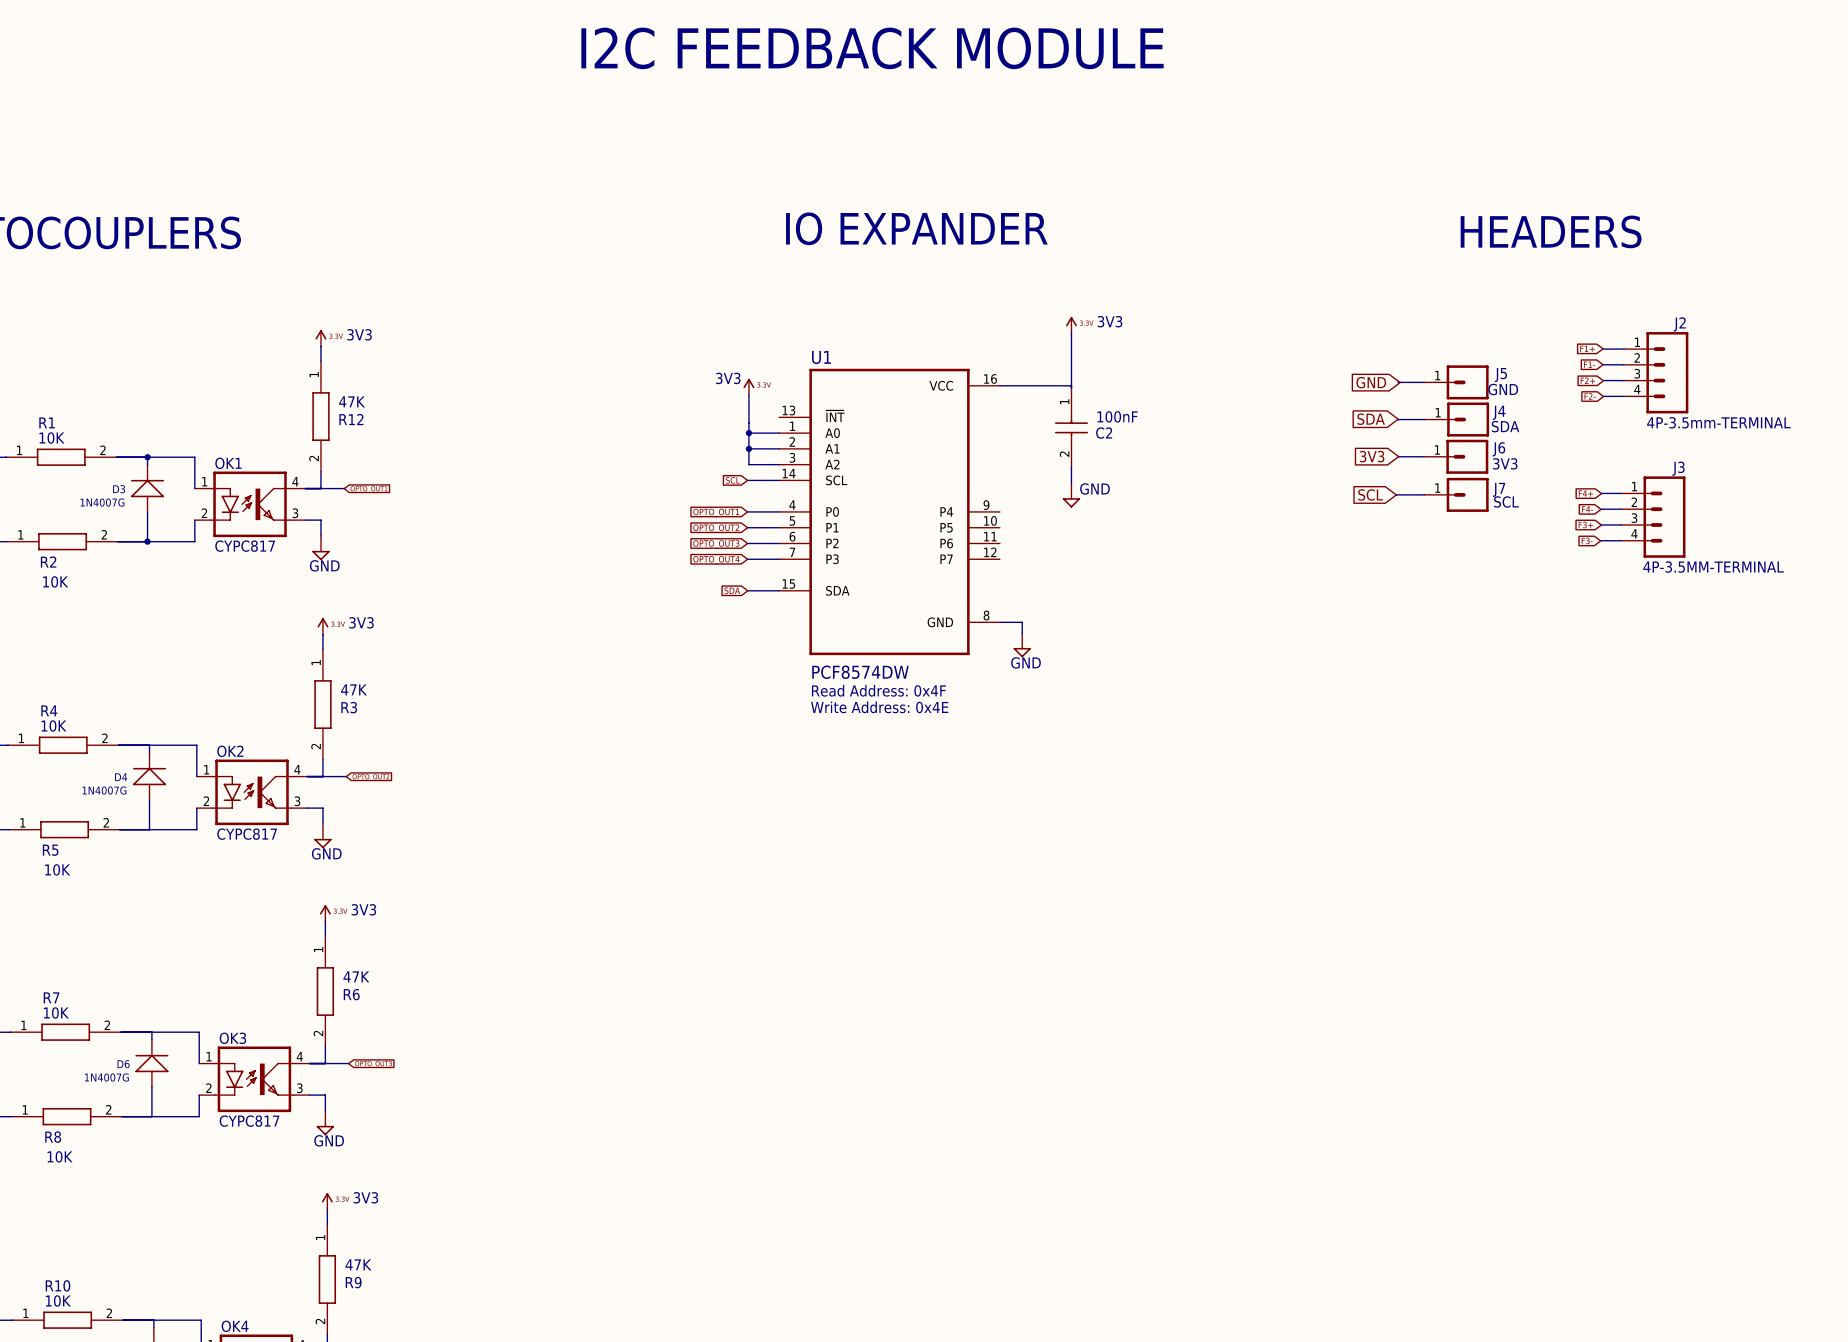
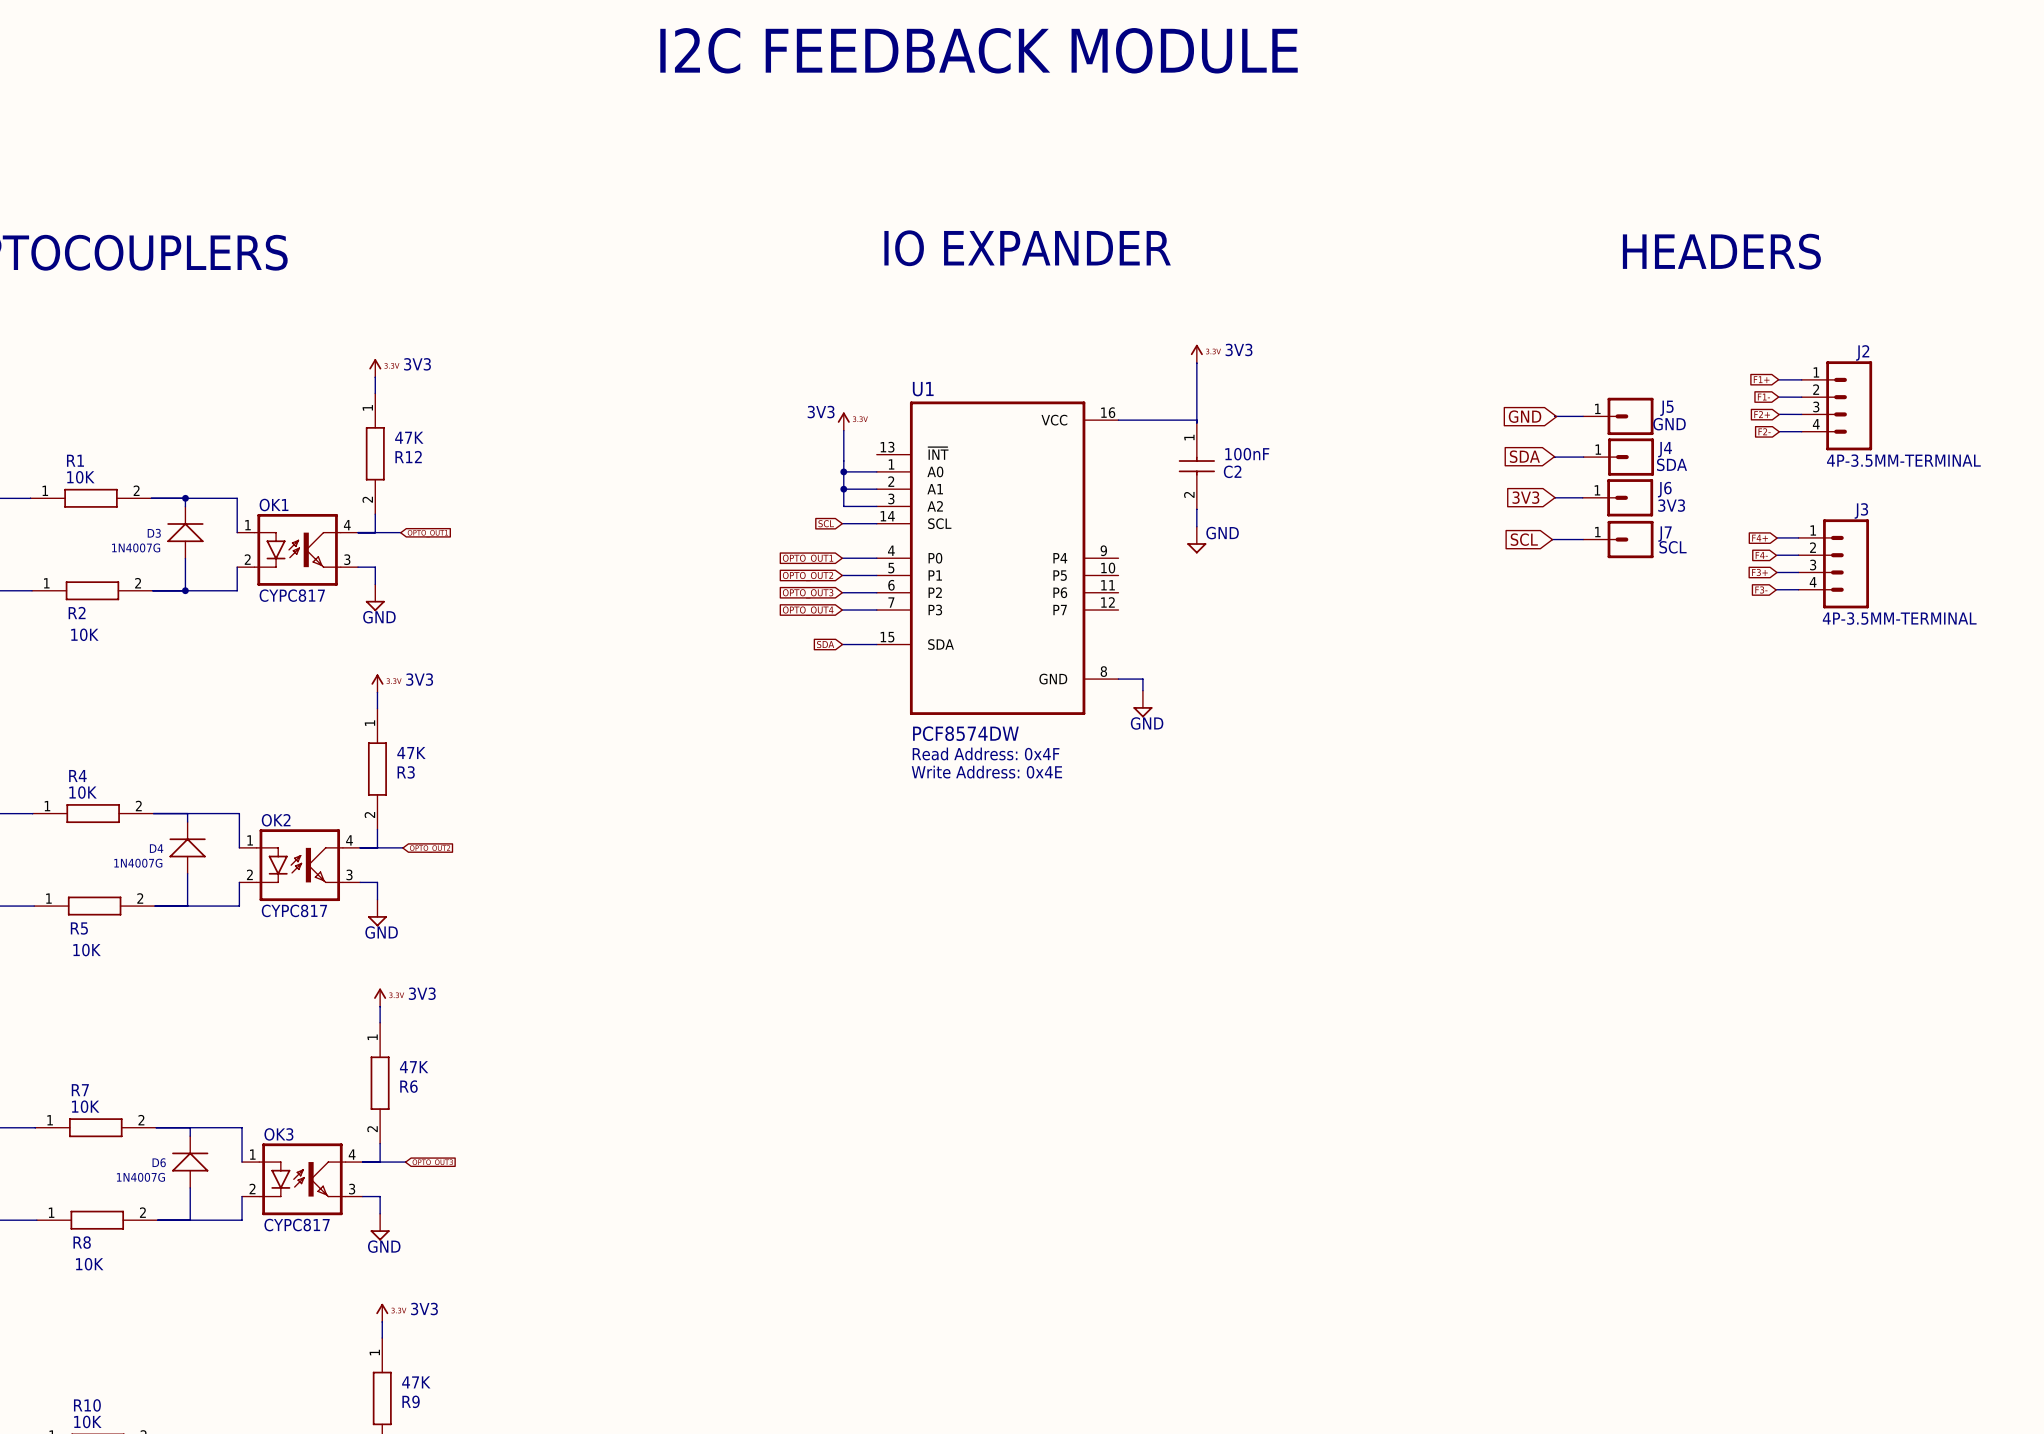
J2 value: 4P-3.5mm-TERMINAL (1718, 422) -> 4P-3.5MM-TERMINAL (1903, 460)

